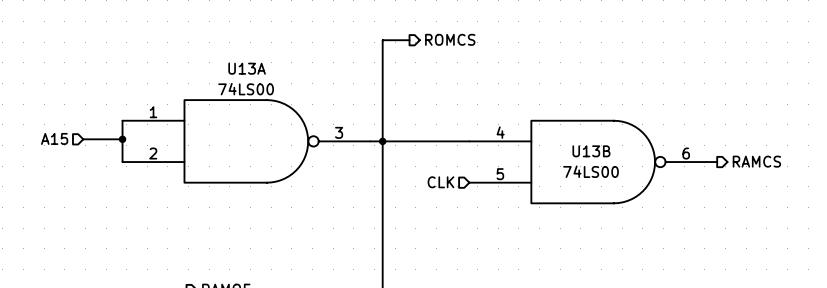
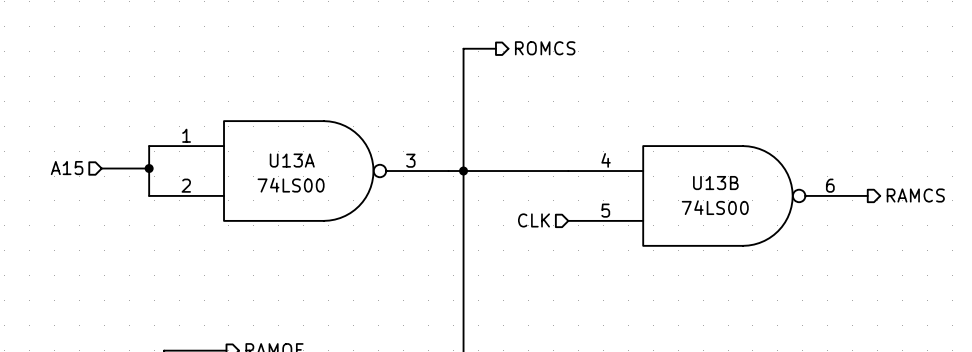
U13A name position: U13A (247, 68) -> U13A (292, 160)
U13A value position: 74LS00 (246, 89) -> 74LS00 (291, 185)

